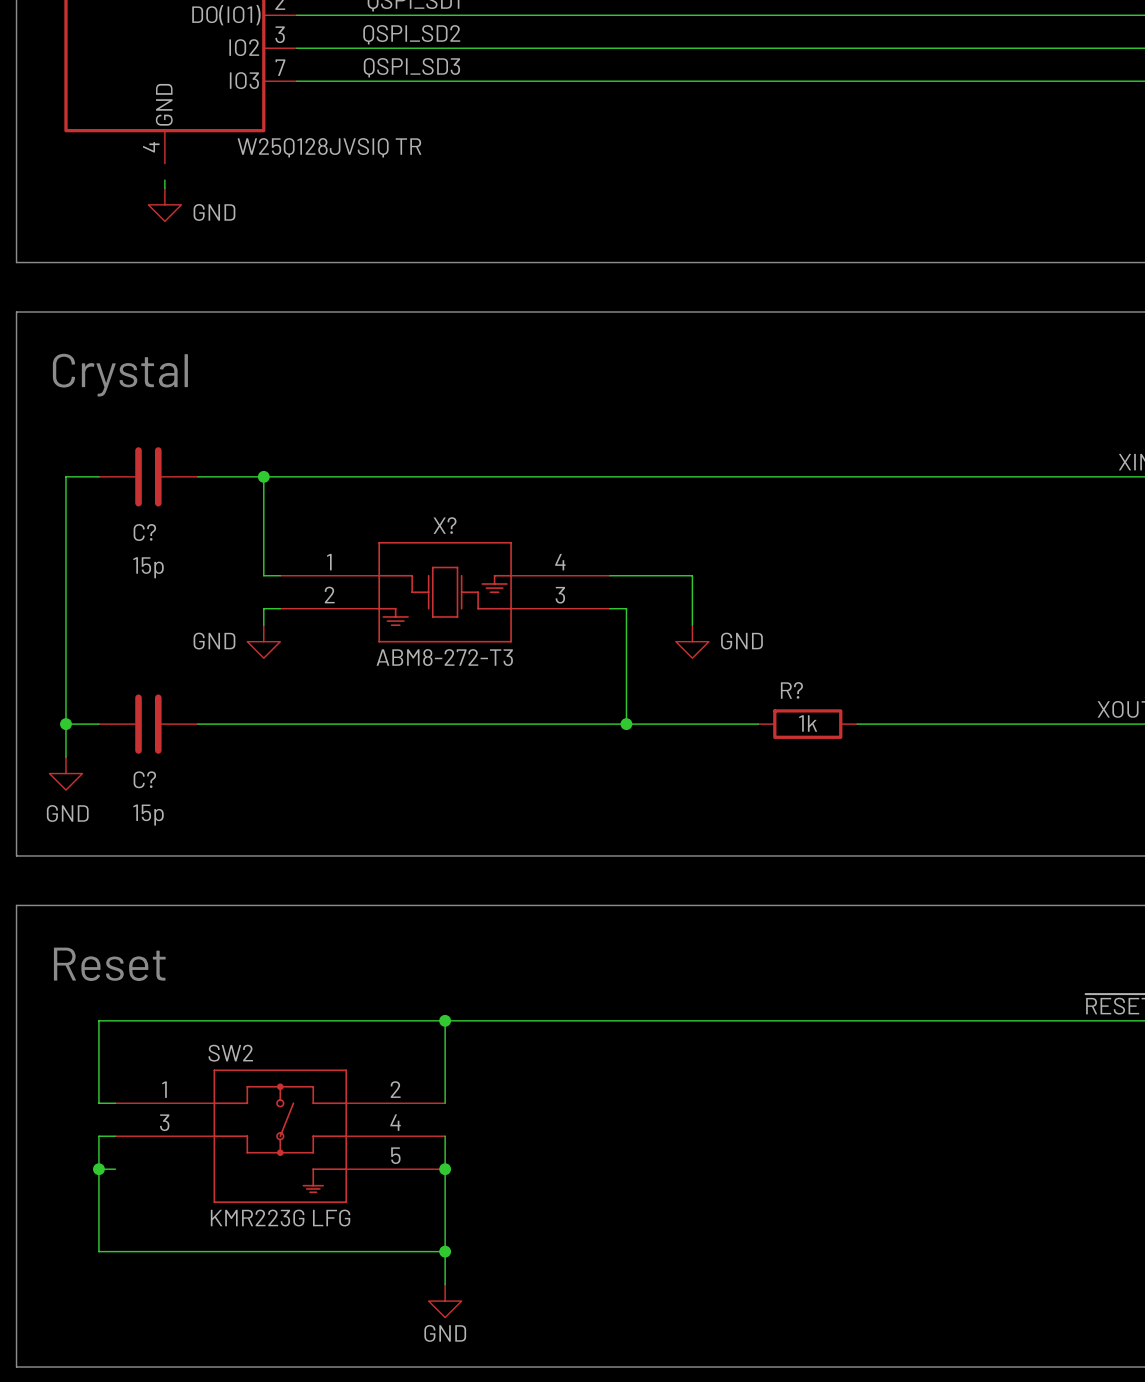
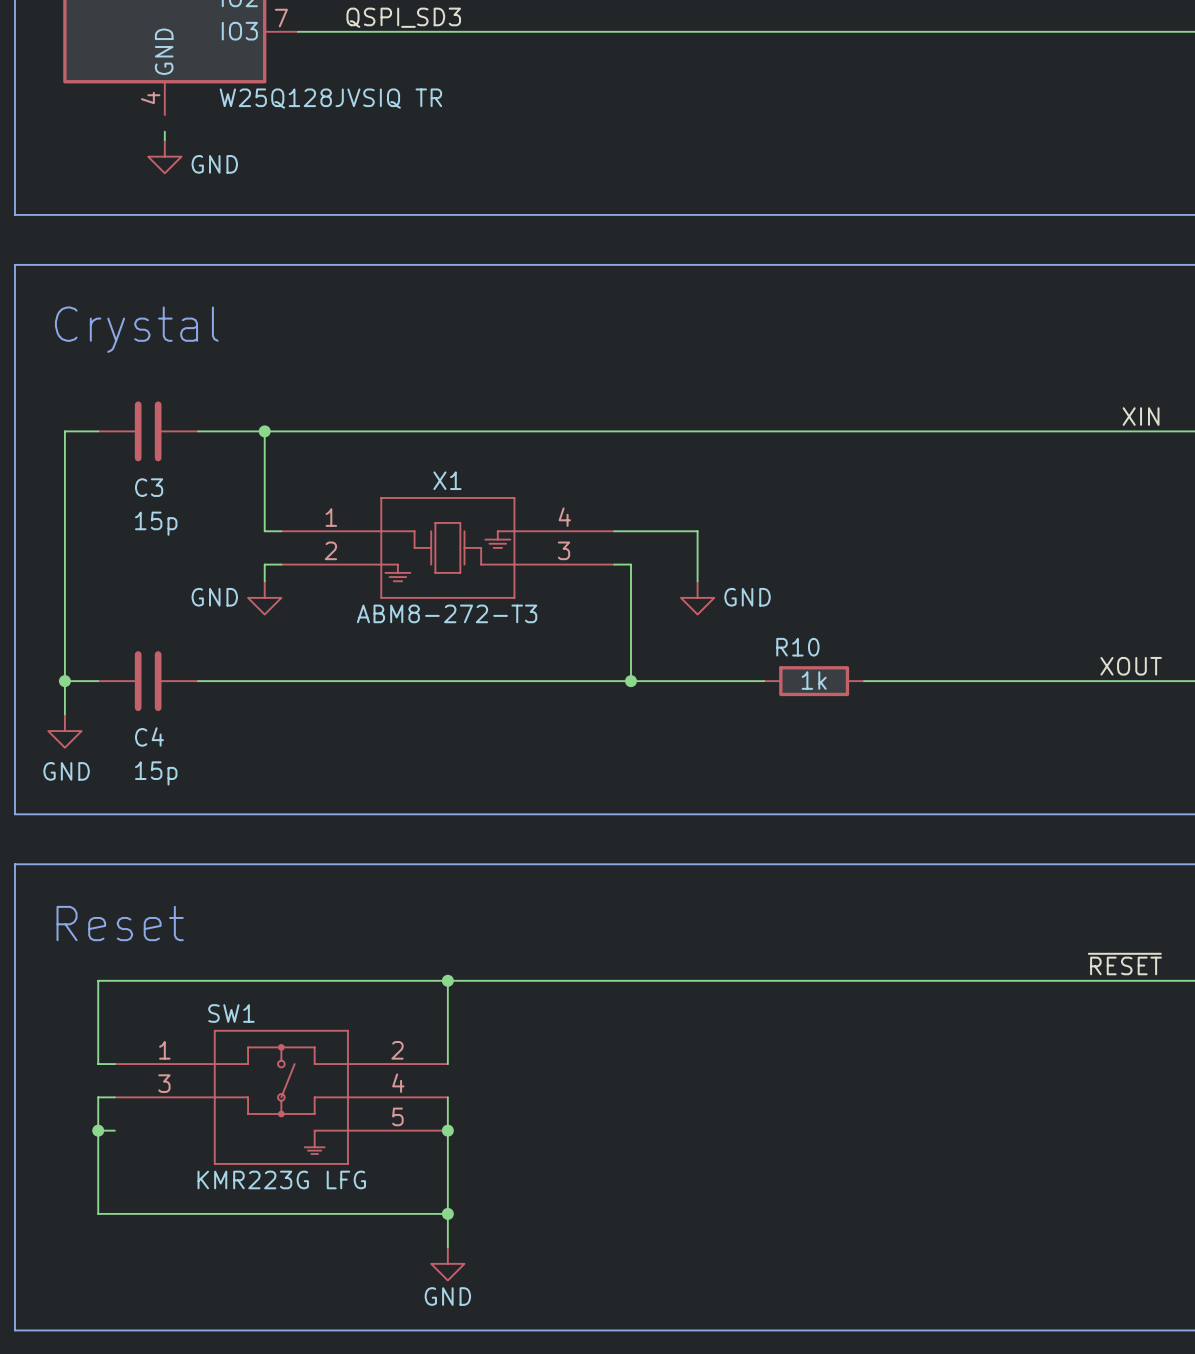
X? name: X? (445, 525) -> X1 (447, 480)
C? name: C? (144, 532) -> C3 (149, 487)
R? name: R? (791, 690) -> R10 (797, 647)
C? name: C? (144, 779) -> C4 (149, 736)
SW2 name: SW2 (230, 1053) -> SW1 (231, 1013)

